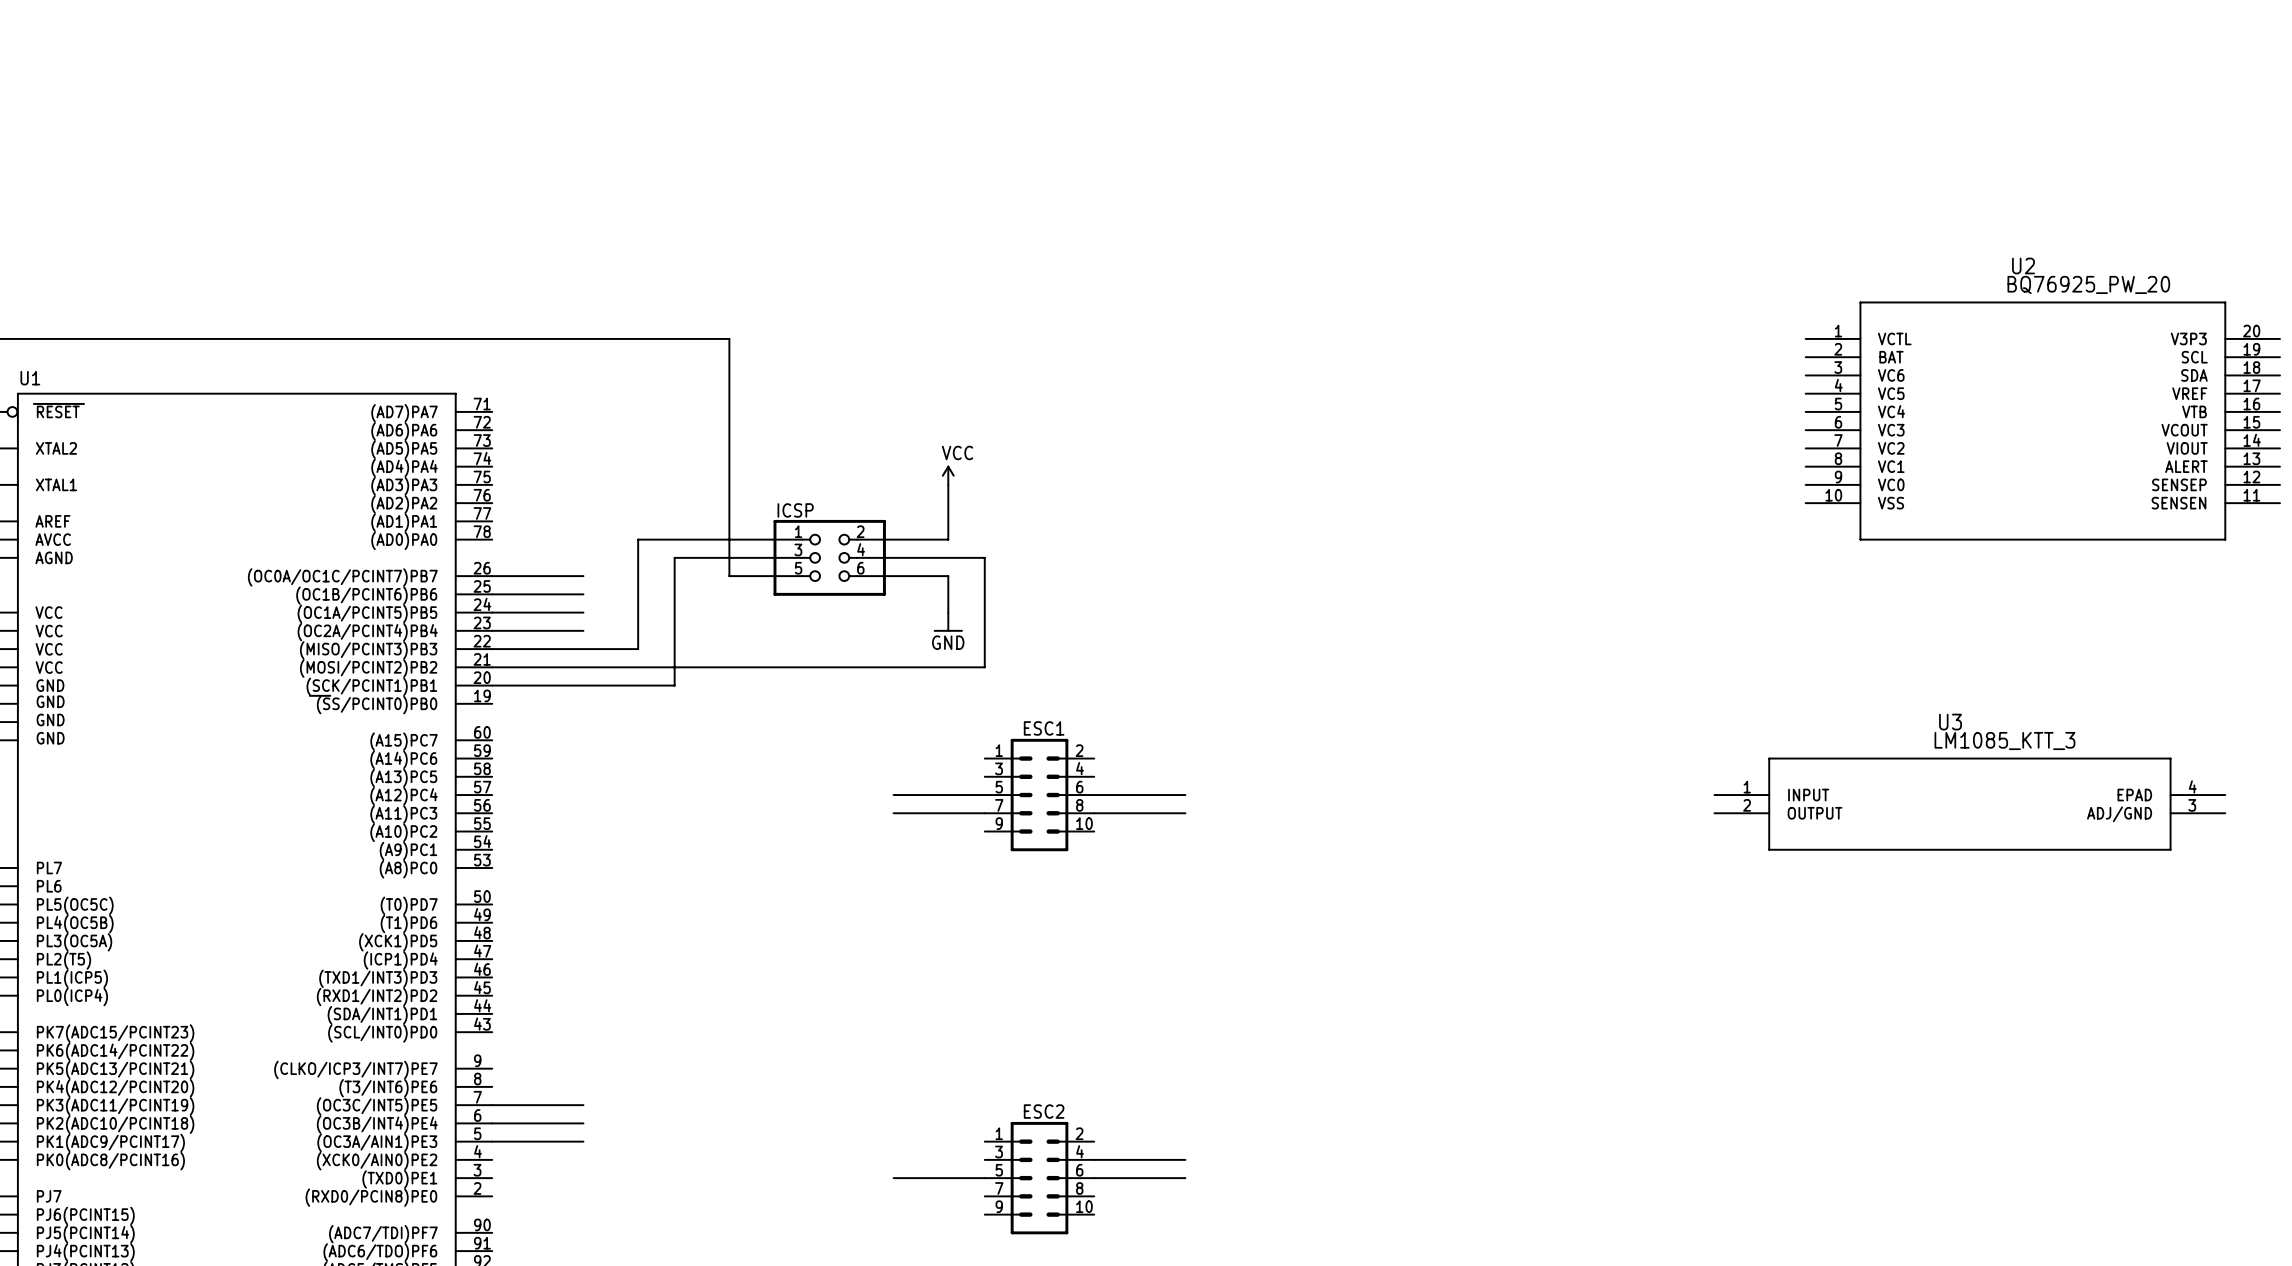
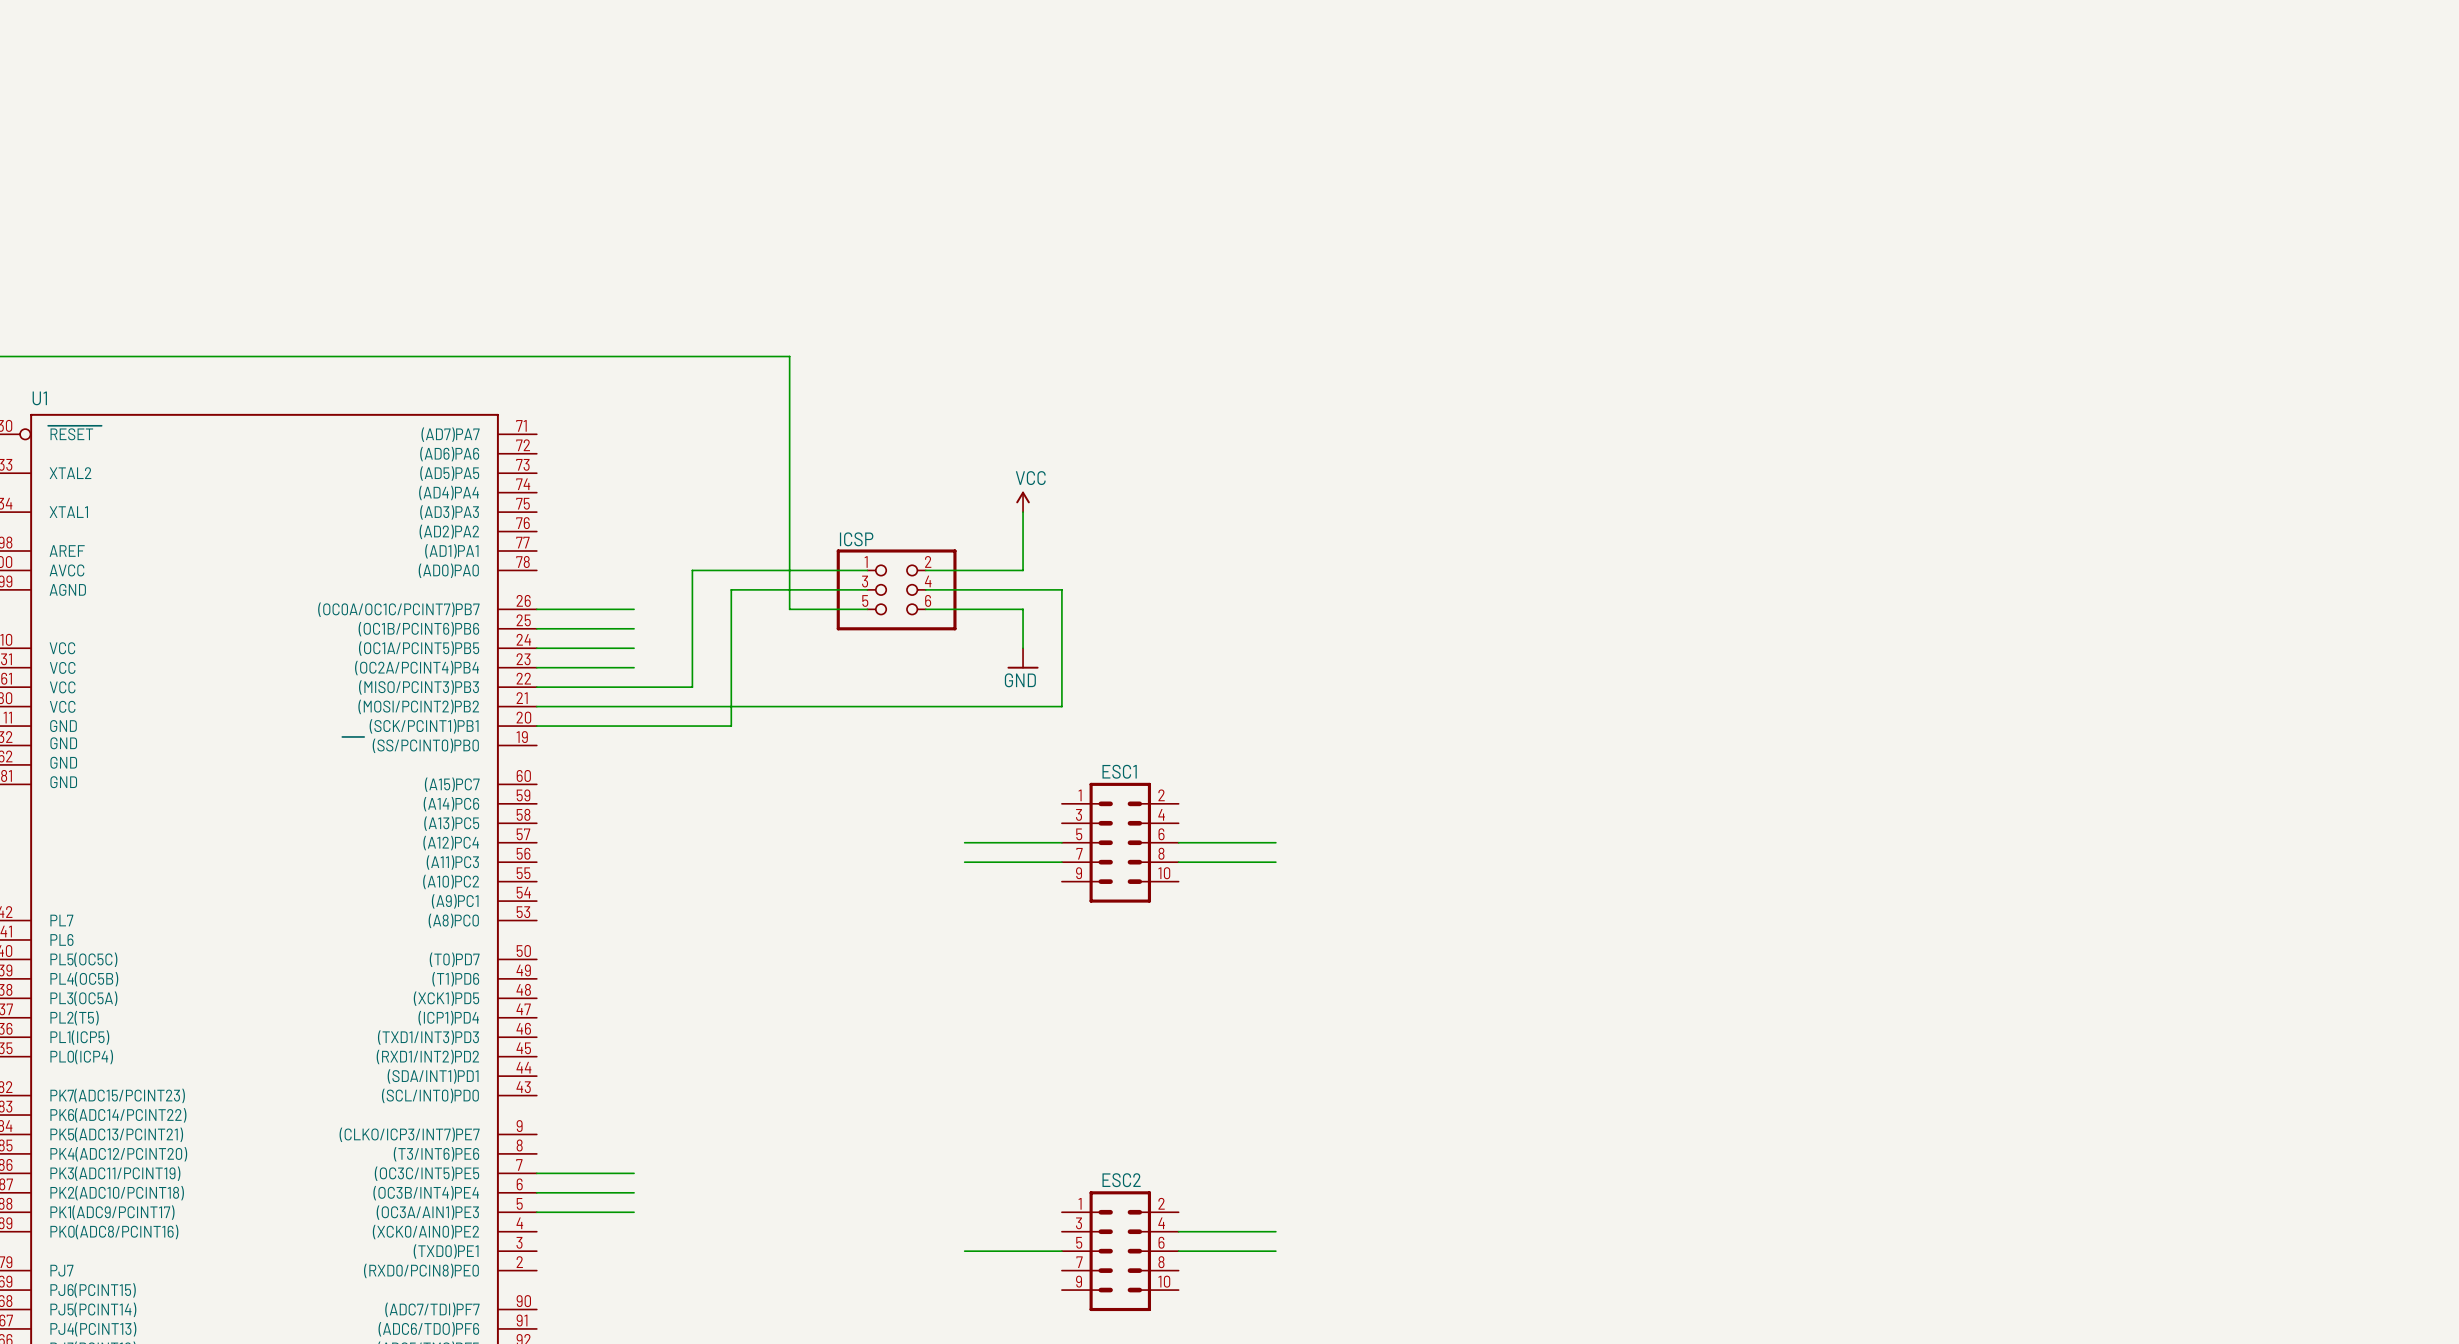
U2: BQ76925_PW_20 (2042, 421) -> none
U3: LM1085_KTT_3 (1969, 804) -> none

